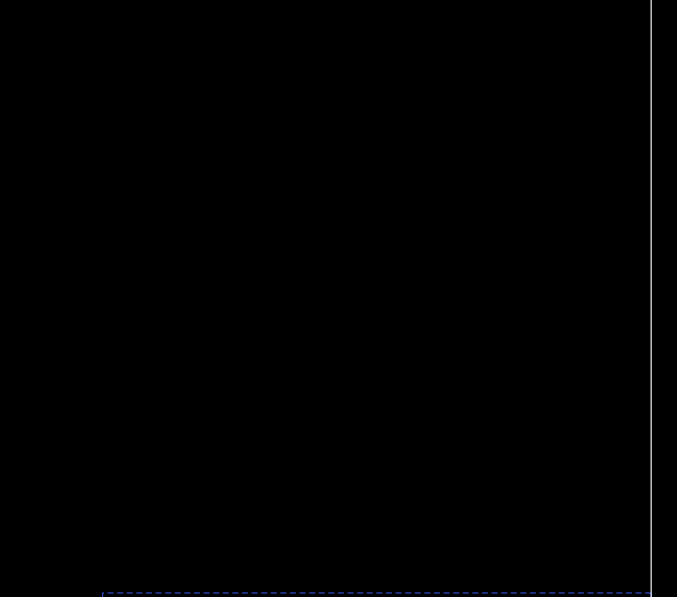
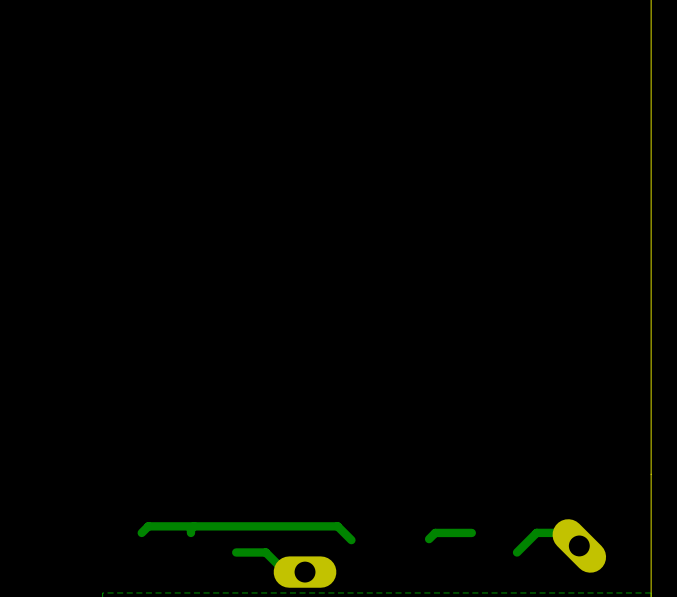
track: none -> (194, 526) (190, 532)
track: none -> (141, 532) (148, 526) (337, 526) (351, 540)
track: none -> (471, 532) (435, 532) (429, 539)
track: none -> (579, 545) (566, 532) (536, 532) (517, 552)
part: none -> (579, 545)
track: none -> (236, 552) (265, 552) (285, 572) (305, 572)
part: none -> (305, 572)

